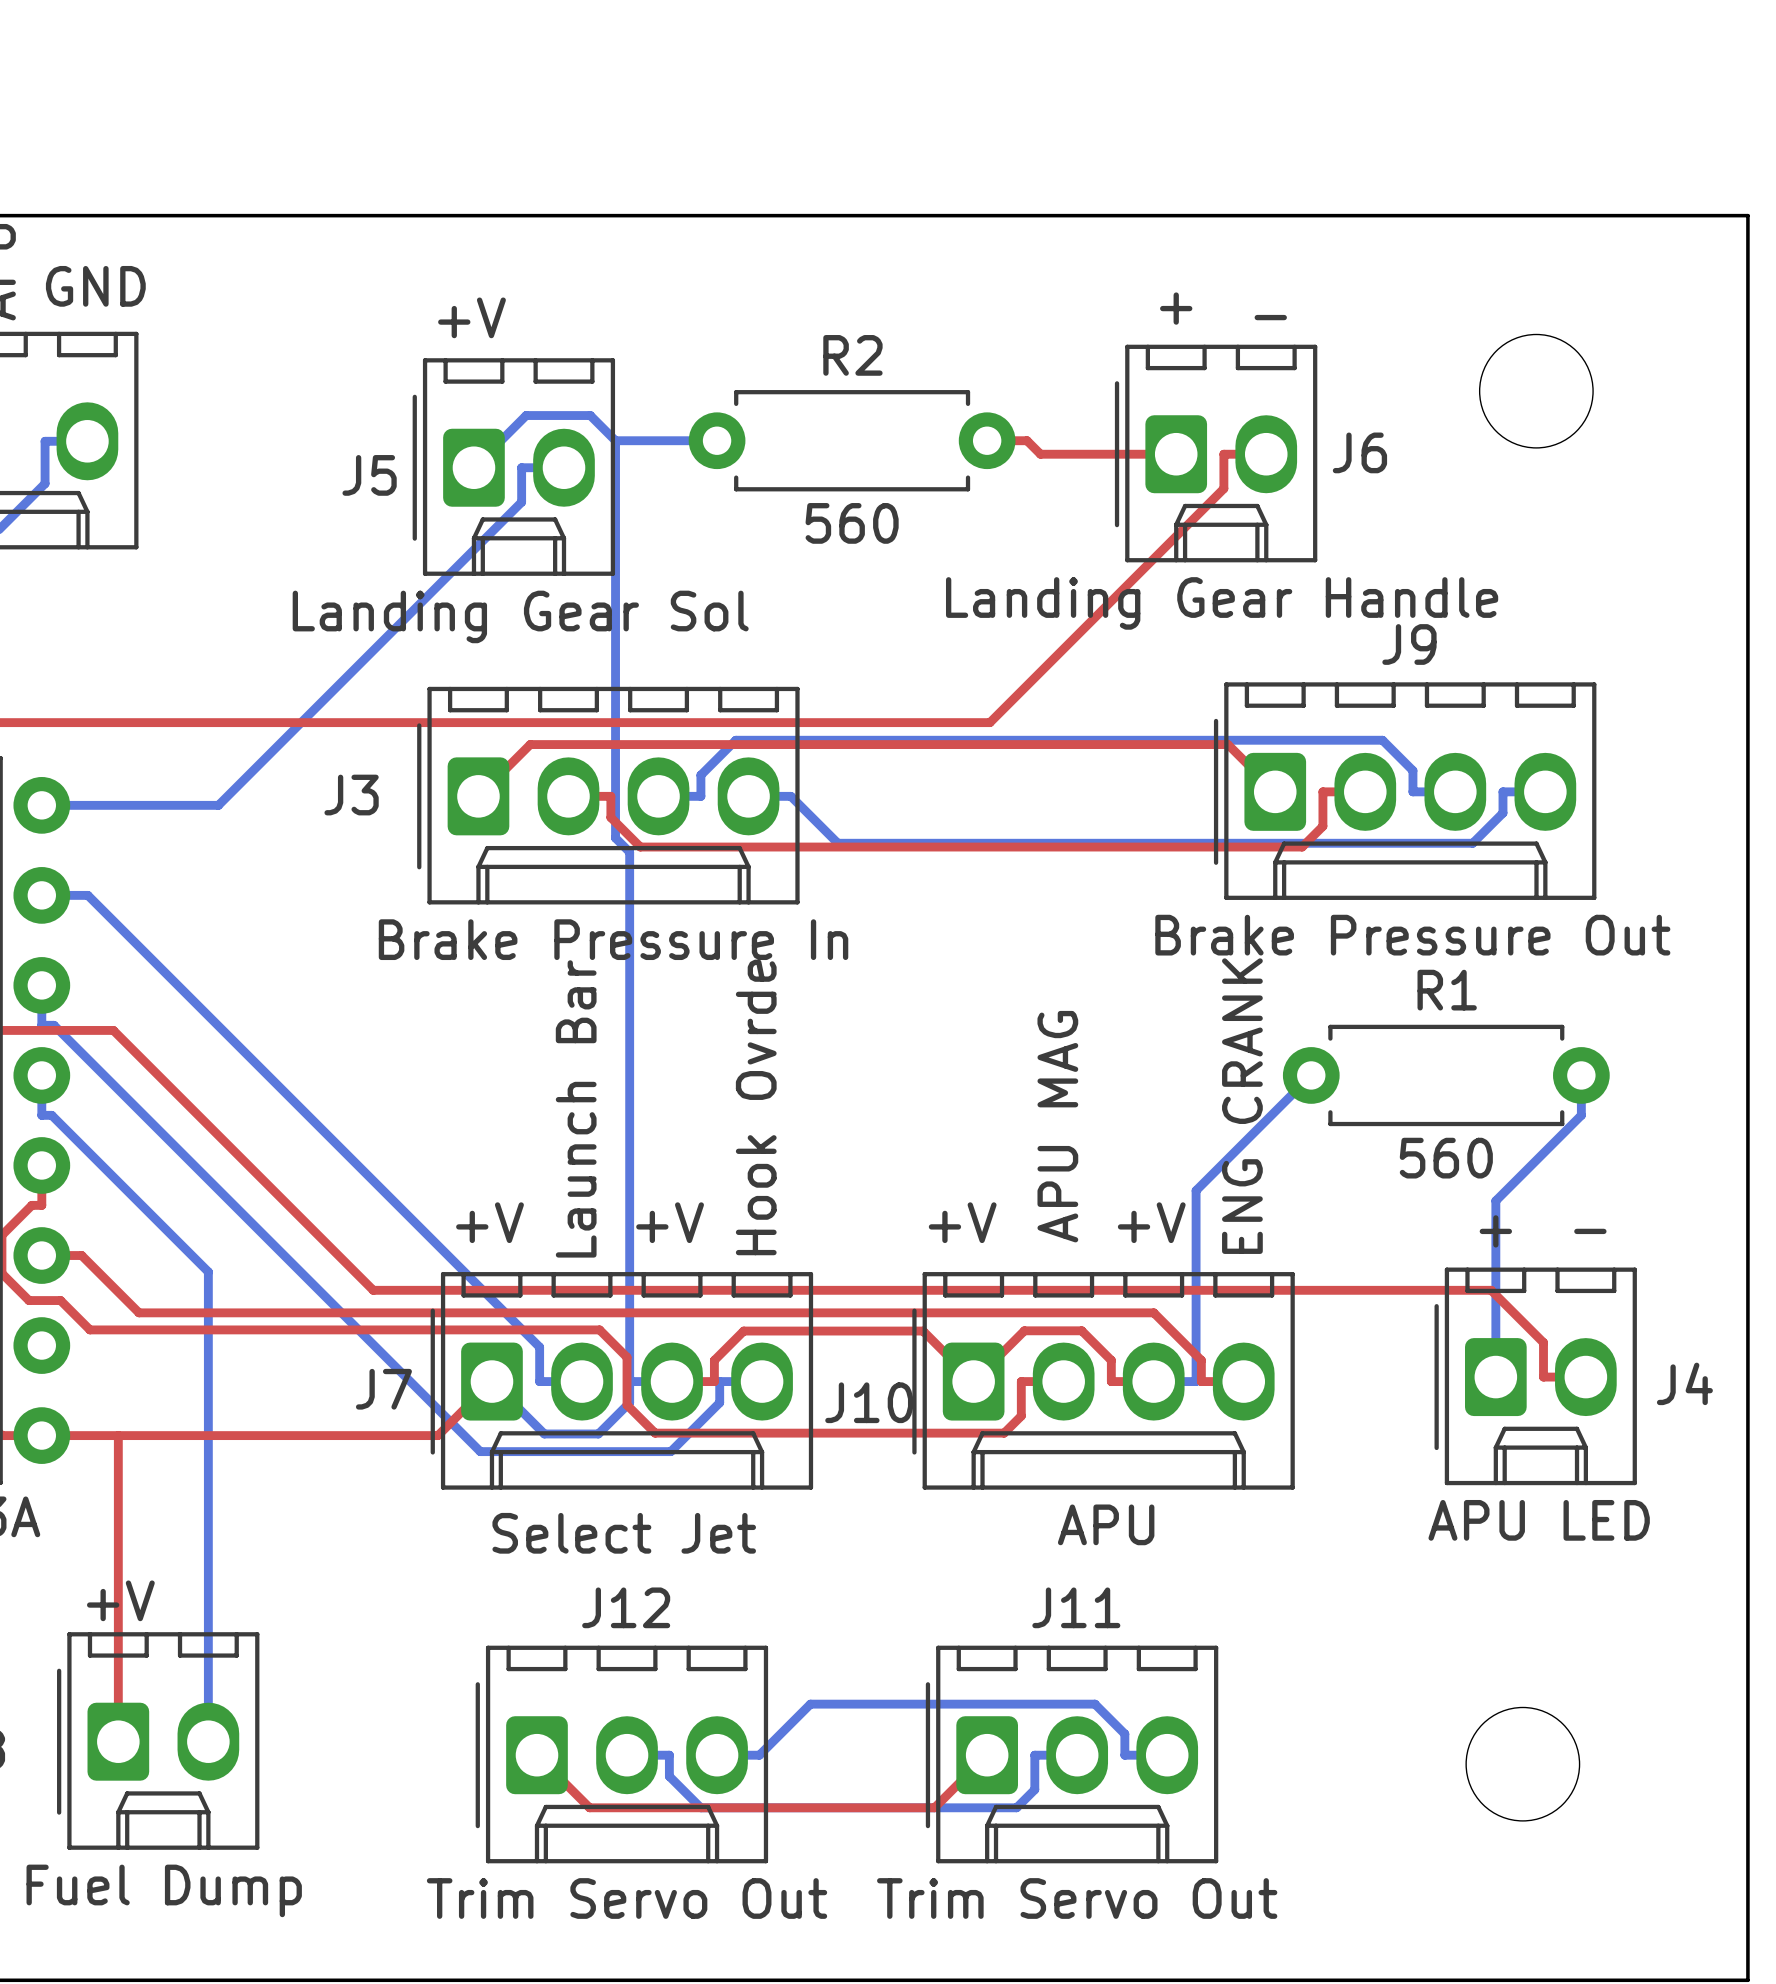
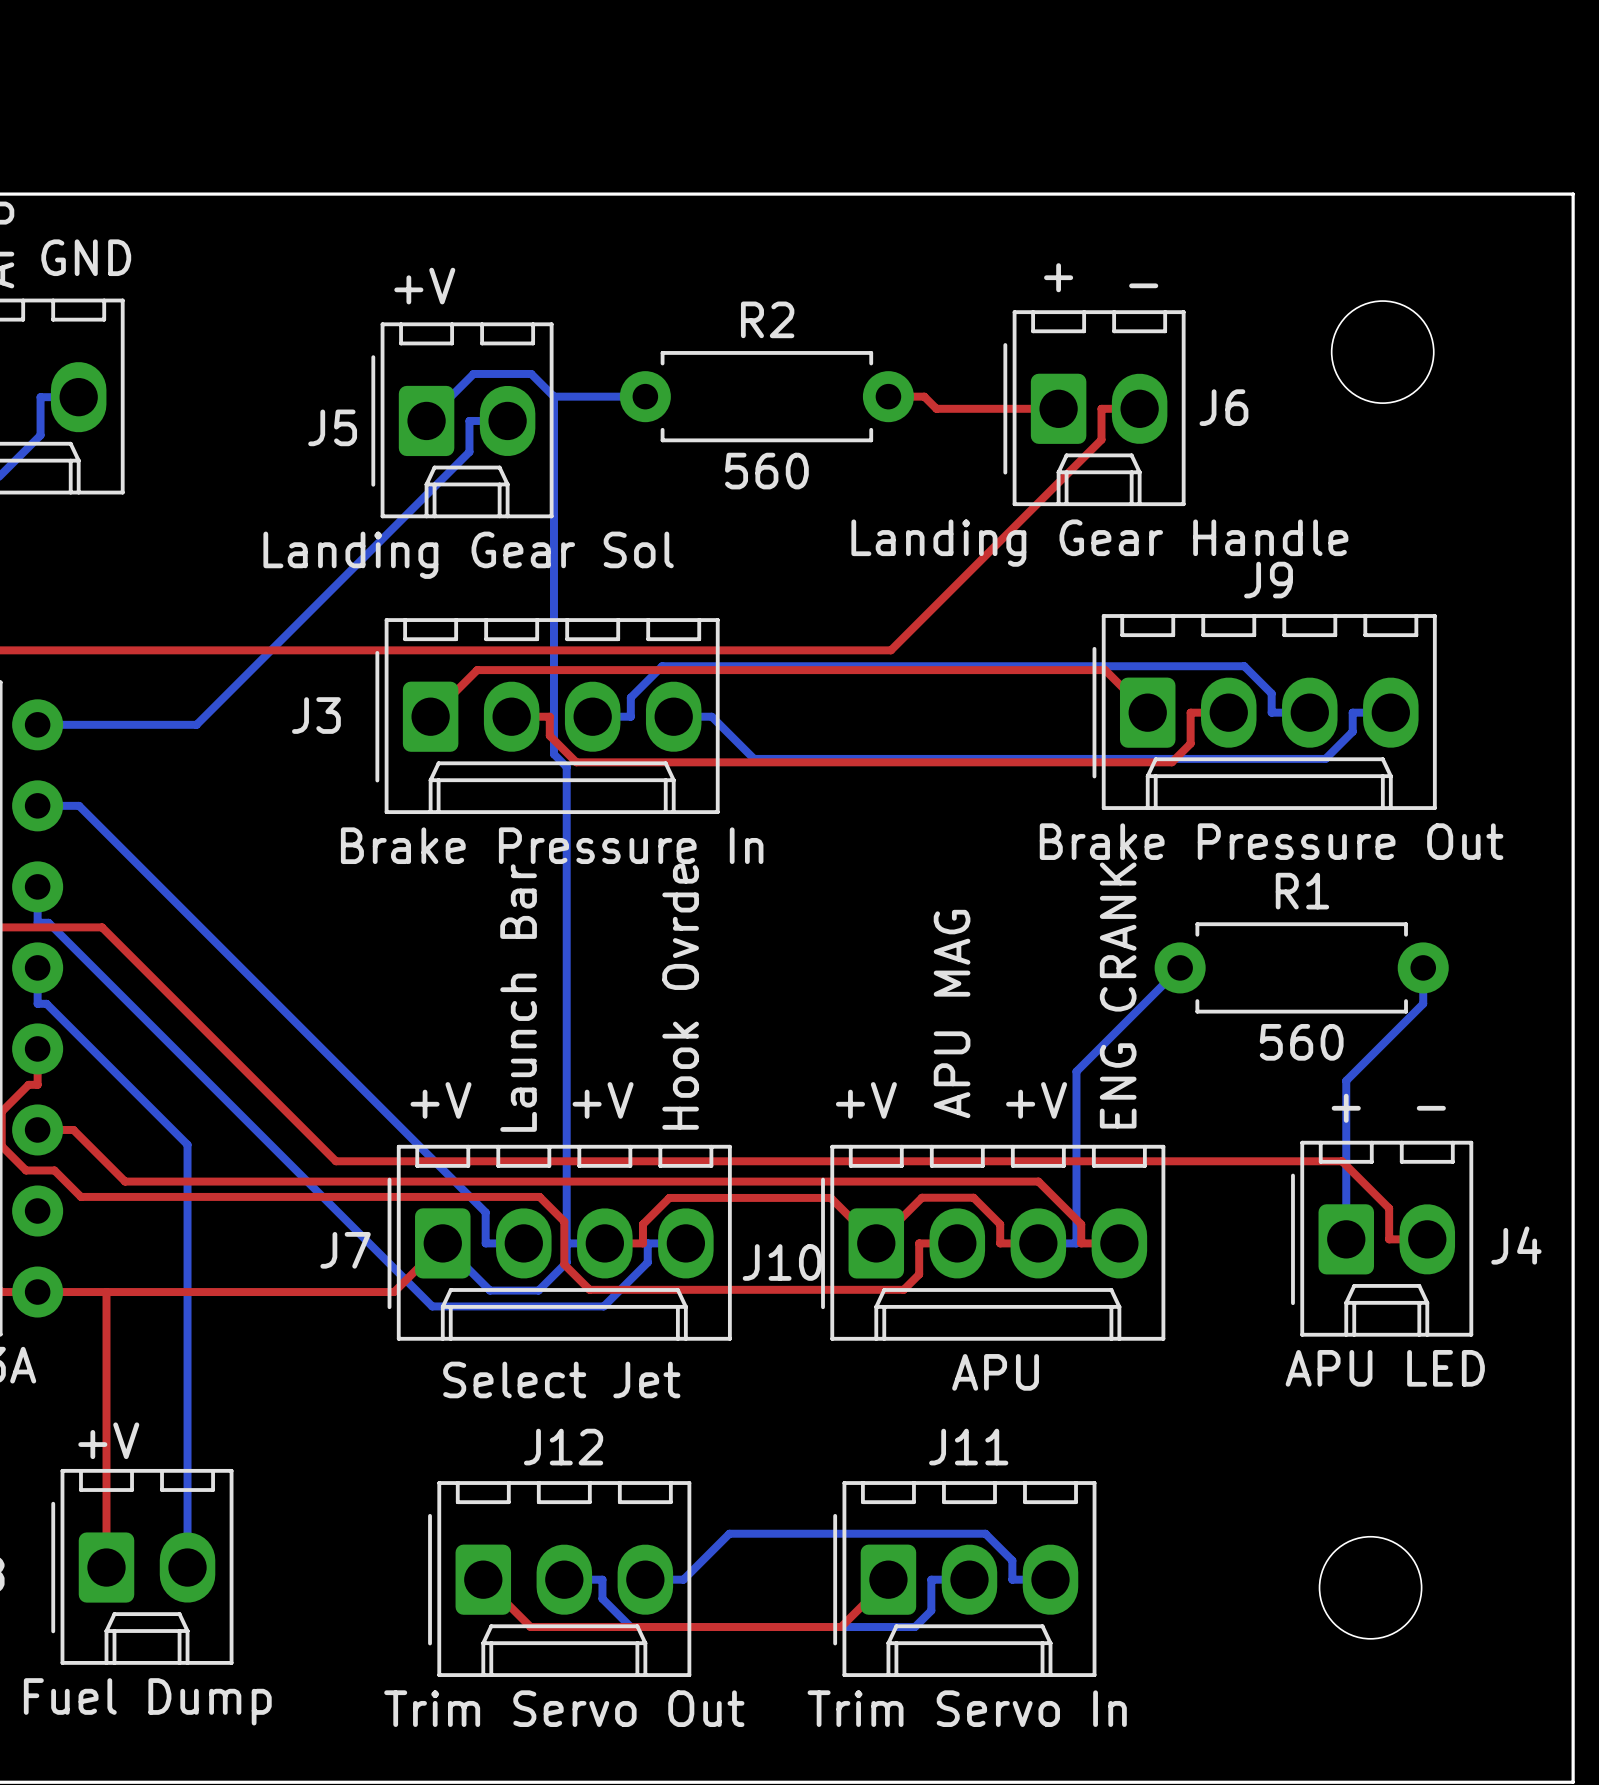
J11 value: Trim Servo Out (1077, 1898) -> Trim Servo In (967, 1708)

